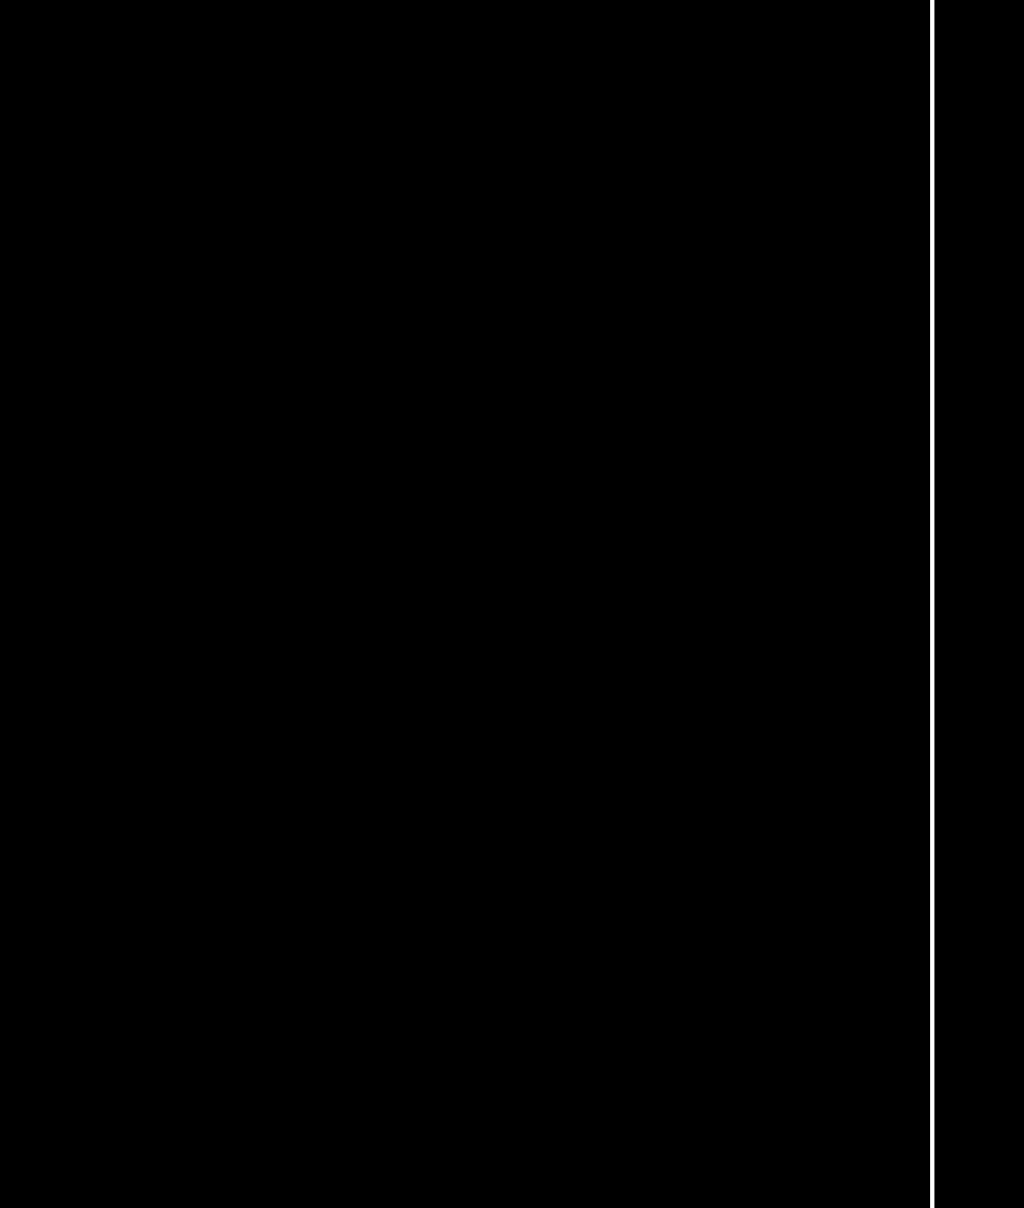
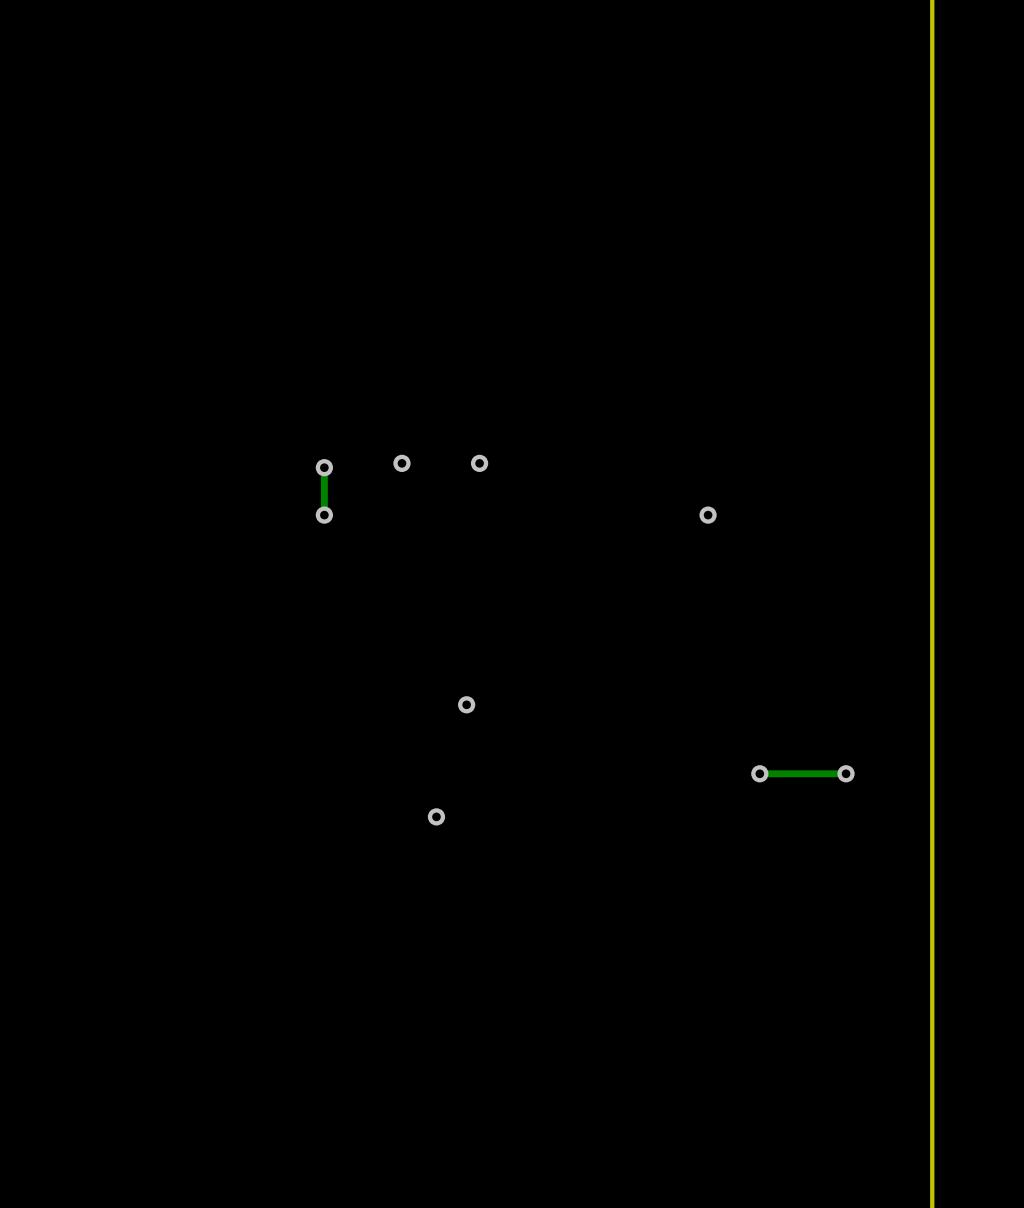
via: none -> (401, 463)
via: none -> (479, 463)
track: none -> (324, 467) (324, 515)
via: none -> (324, 467)
via: none -> (324, 515)
via: none -> (708, 515)
via: none -> (466, 704)
via: none -> (759, 773)
track: none -> (846, 773) (759, 773)
via: none -> (846, 773)
via: none -> (436, 816)

